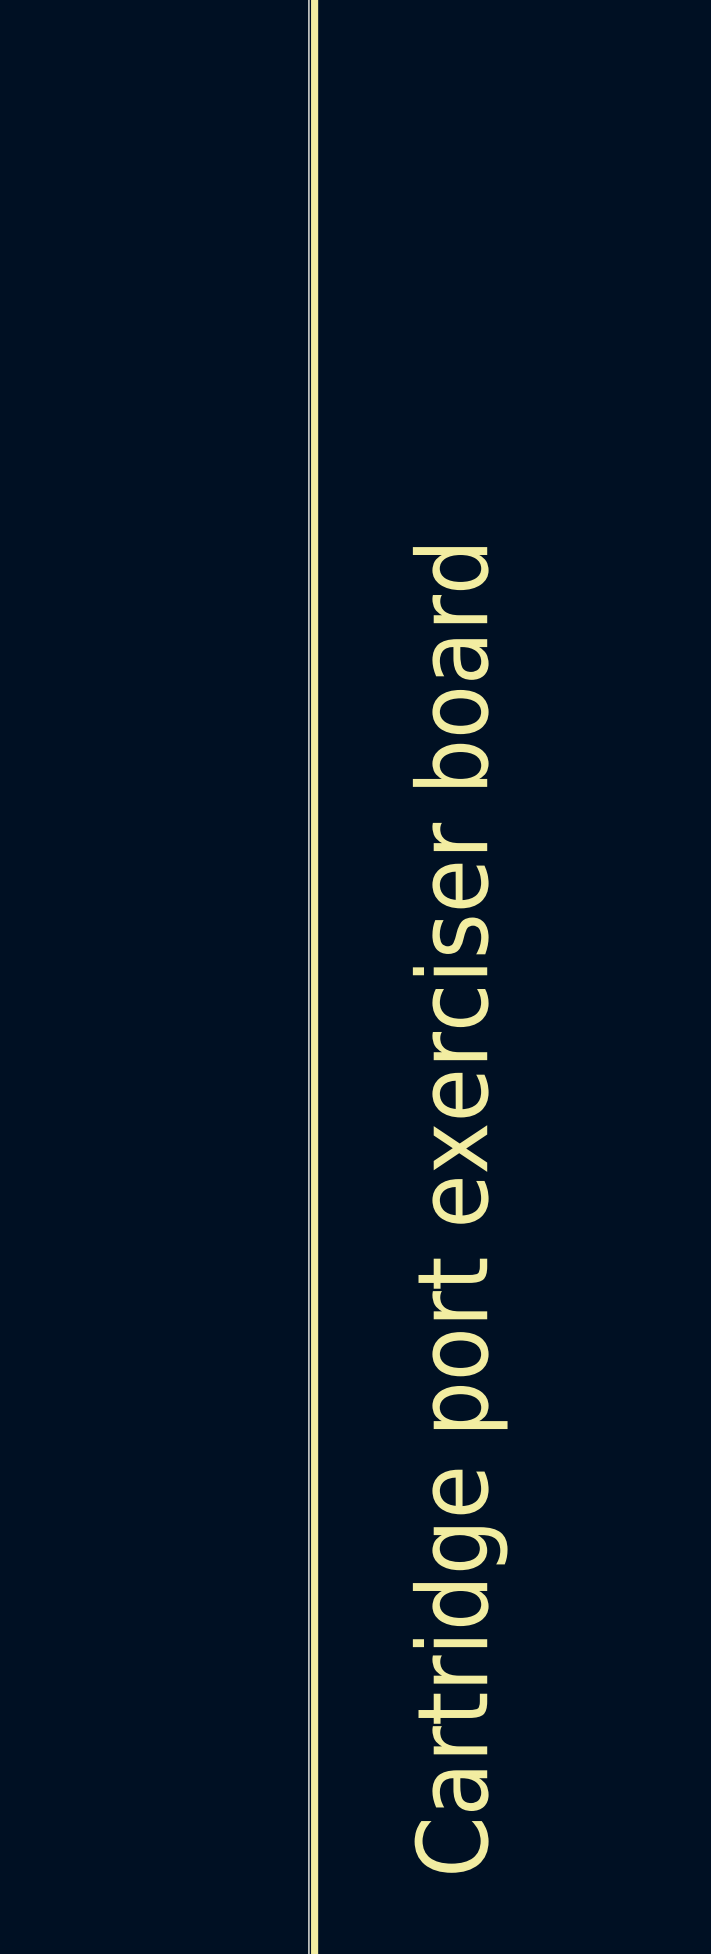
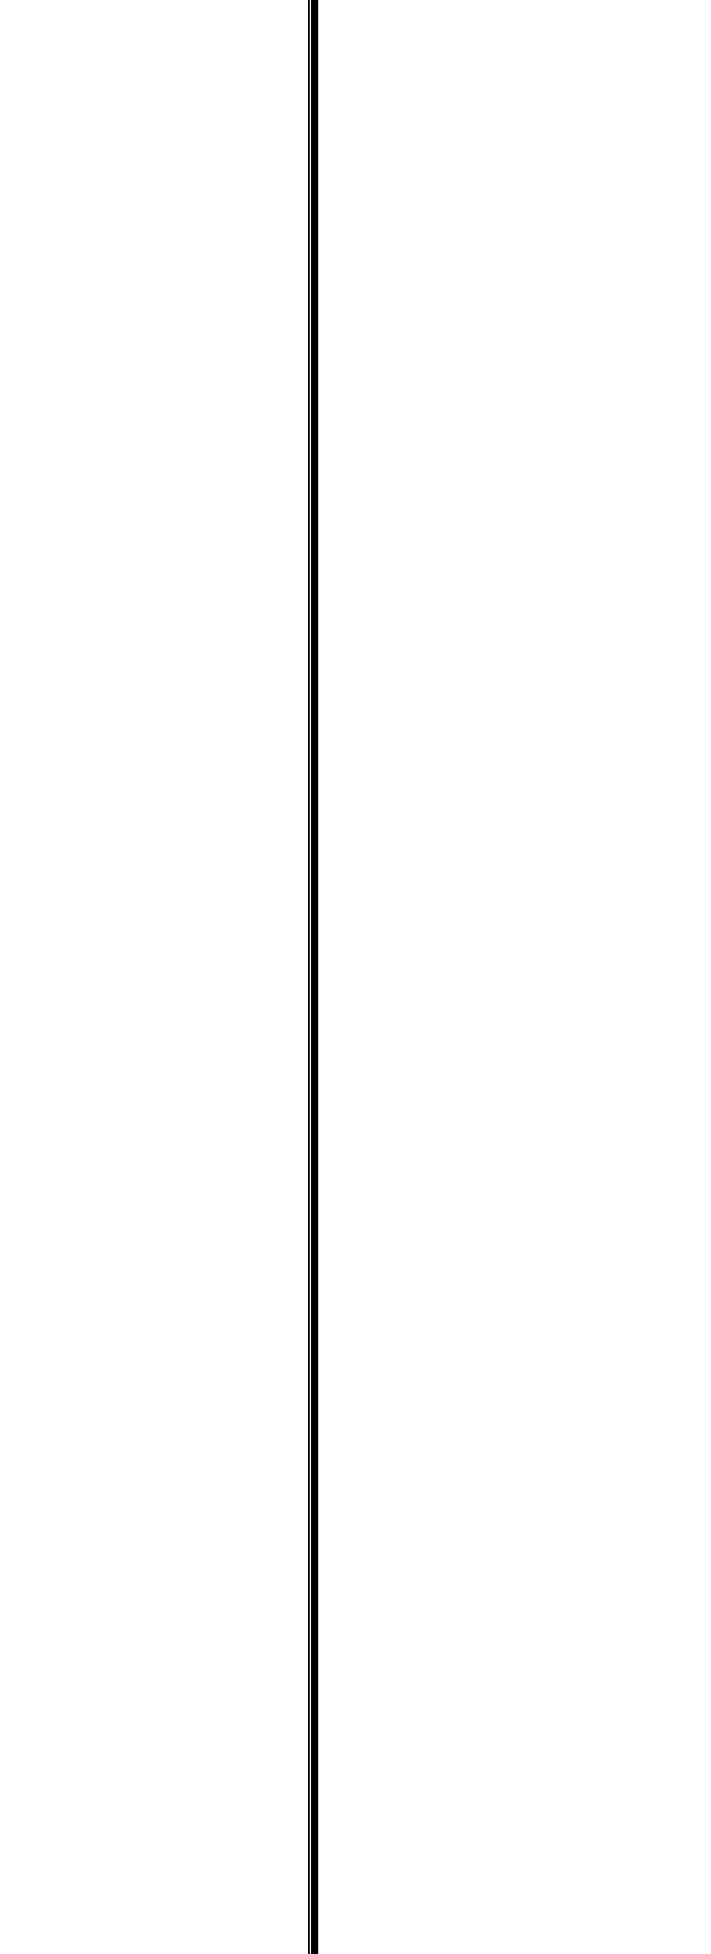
text: Cartridge port exerciser board (460, 1209) -> none

